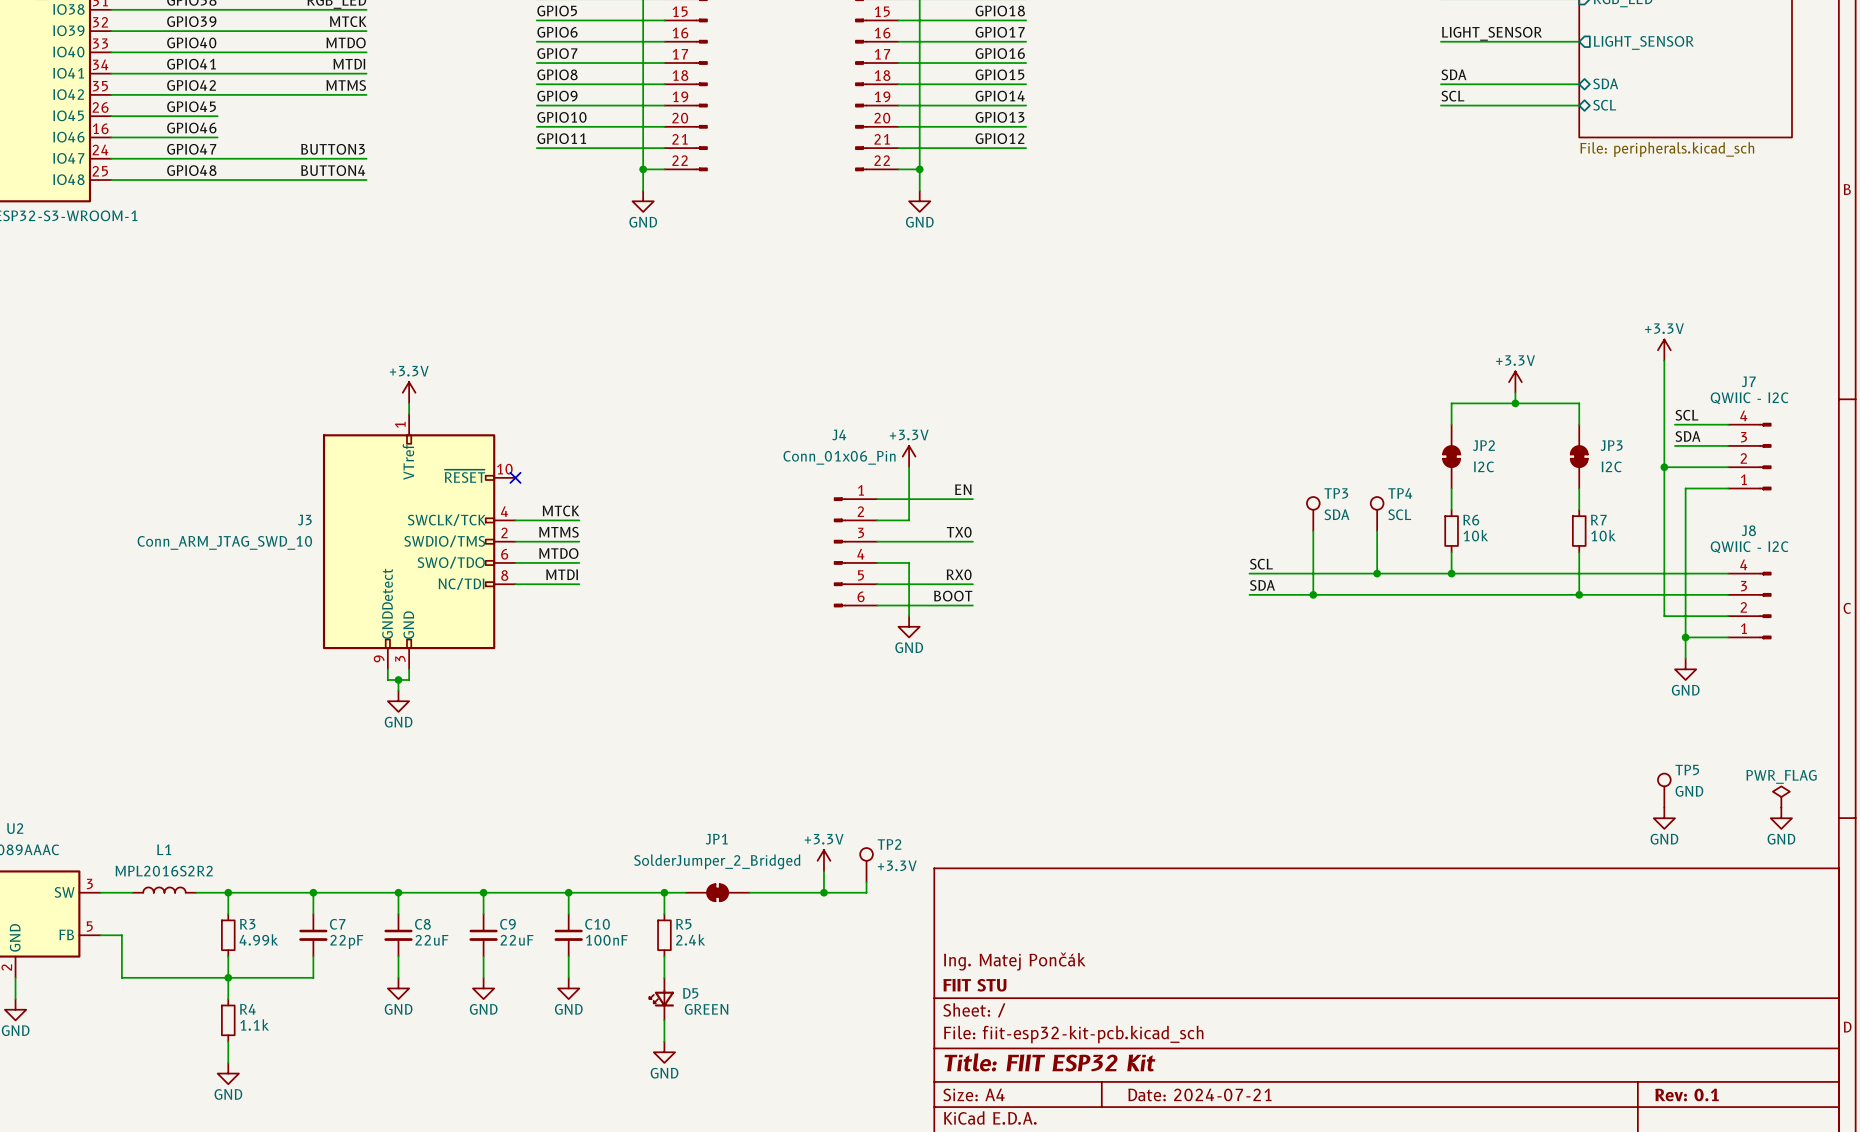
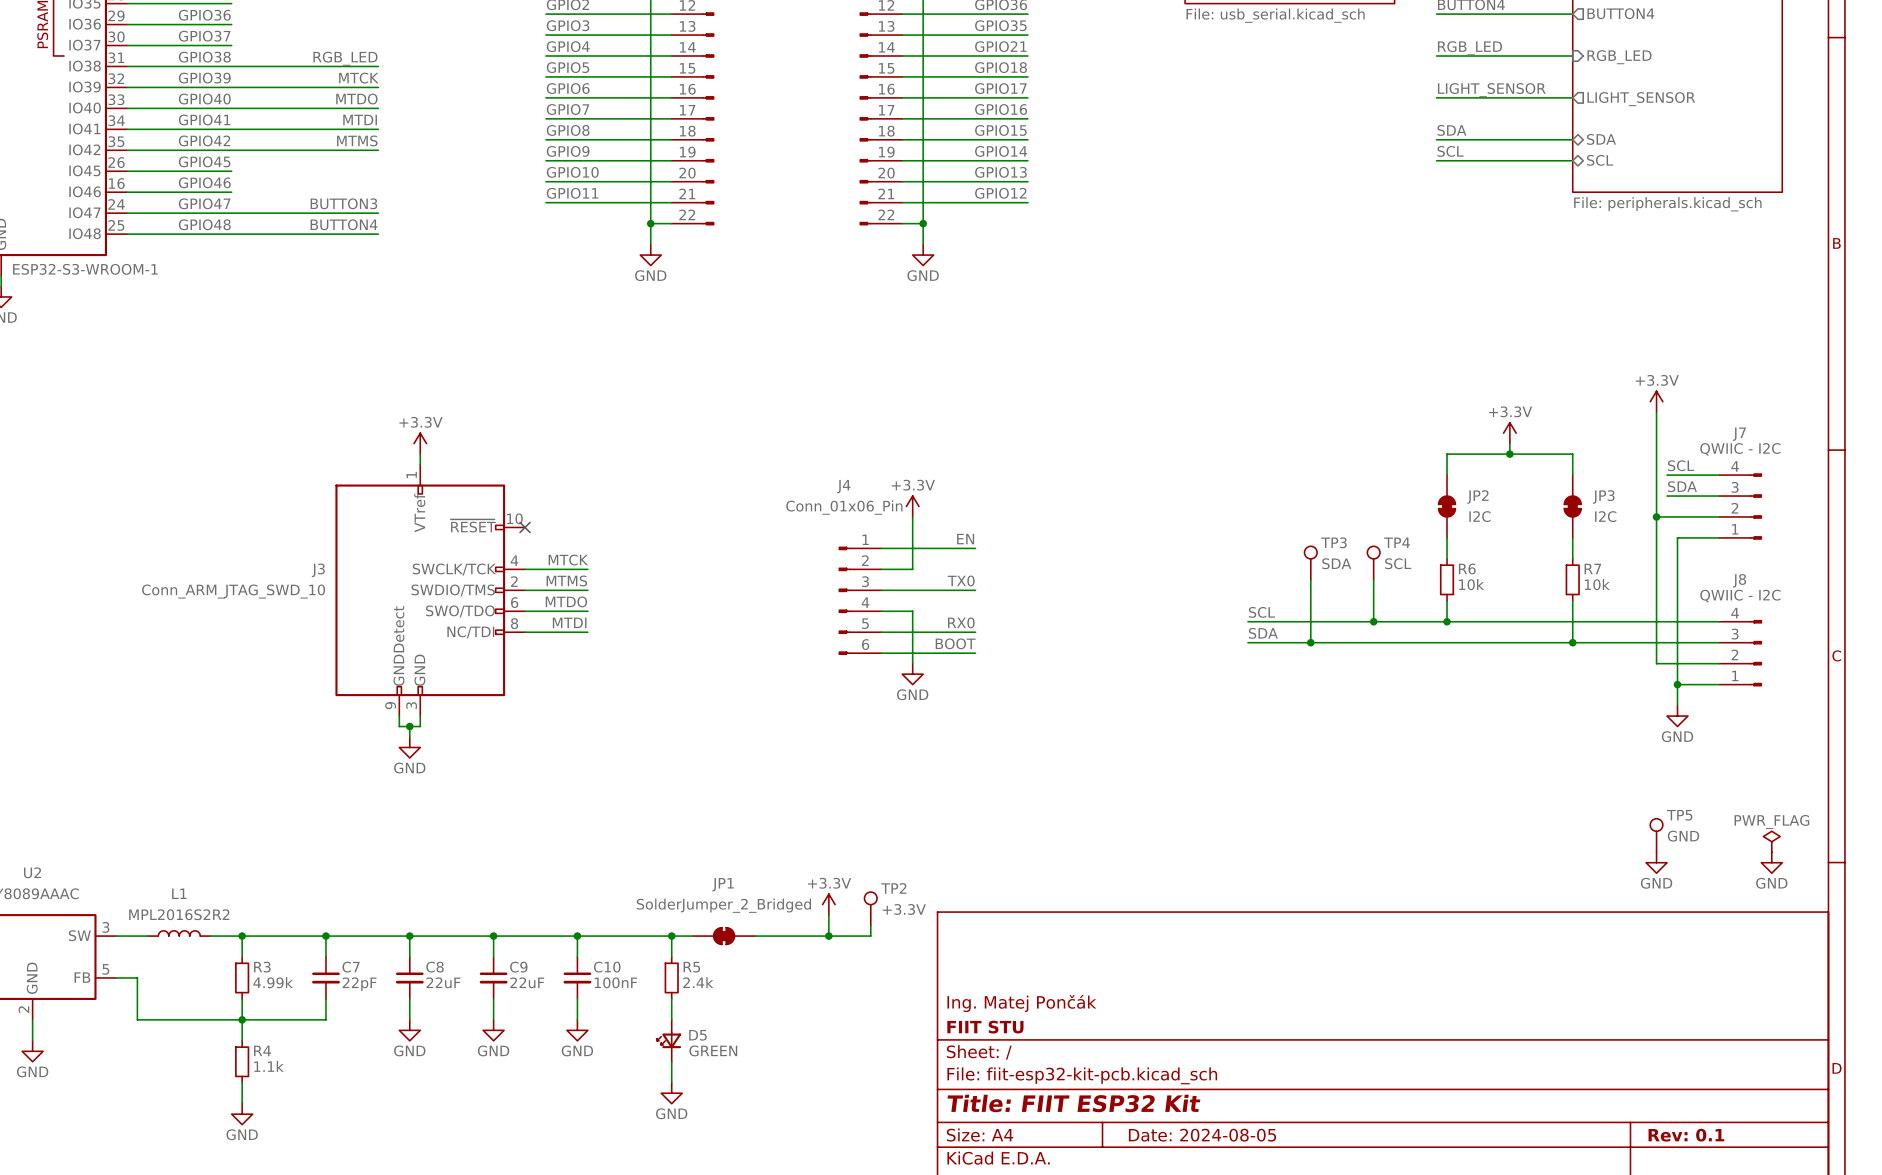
title block: Date: 2024-07-21 (1199, 1094) -> Date: 2024-08-05 (1202, 1135)

